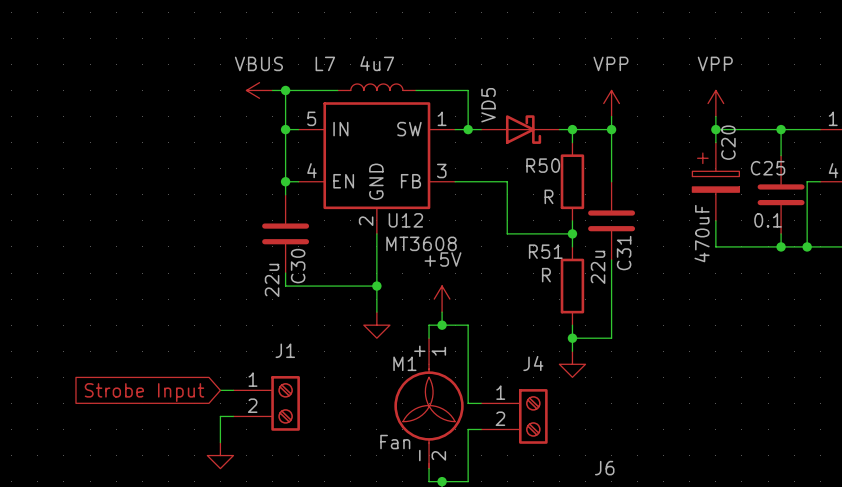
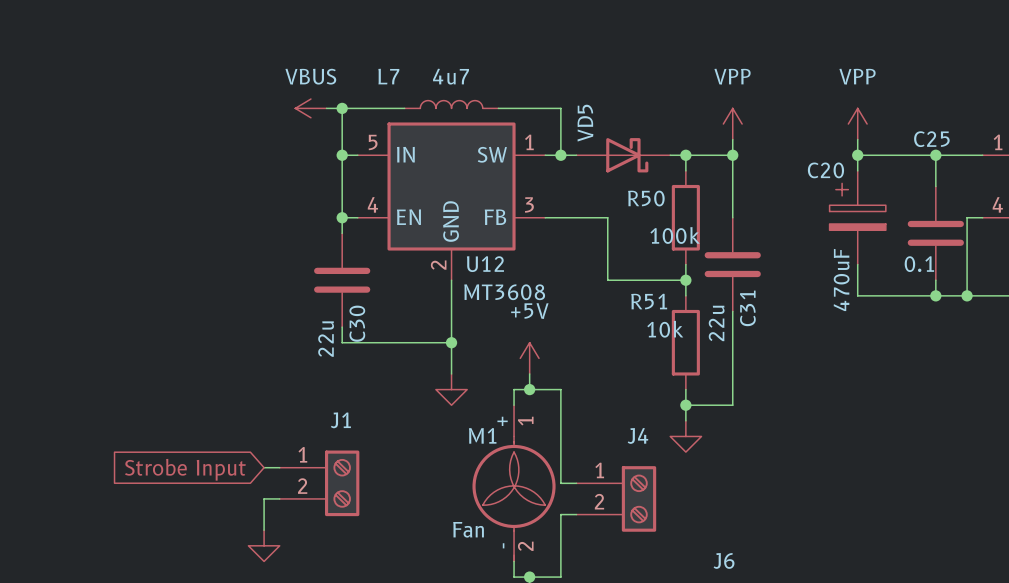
C20 name rotation: 0° (728, 142) -> 90° clockwise (825, 170)
C25 name position: C25 (768, 168) -> C25 (931, 139)
R50 value: R (549, 196) -> 100k (675, 235)
R51 value: R (546, 275) -> 10k (665, 329)

